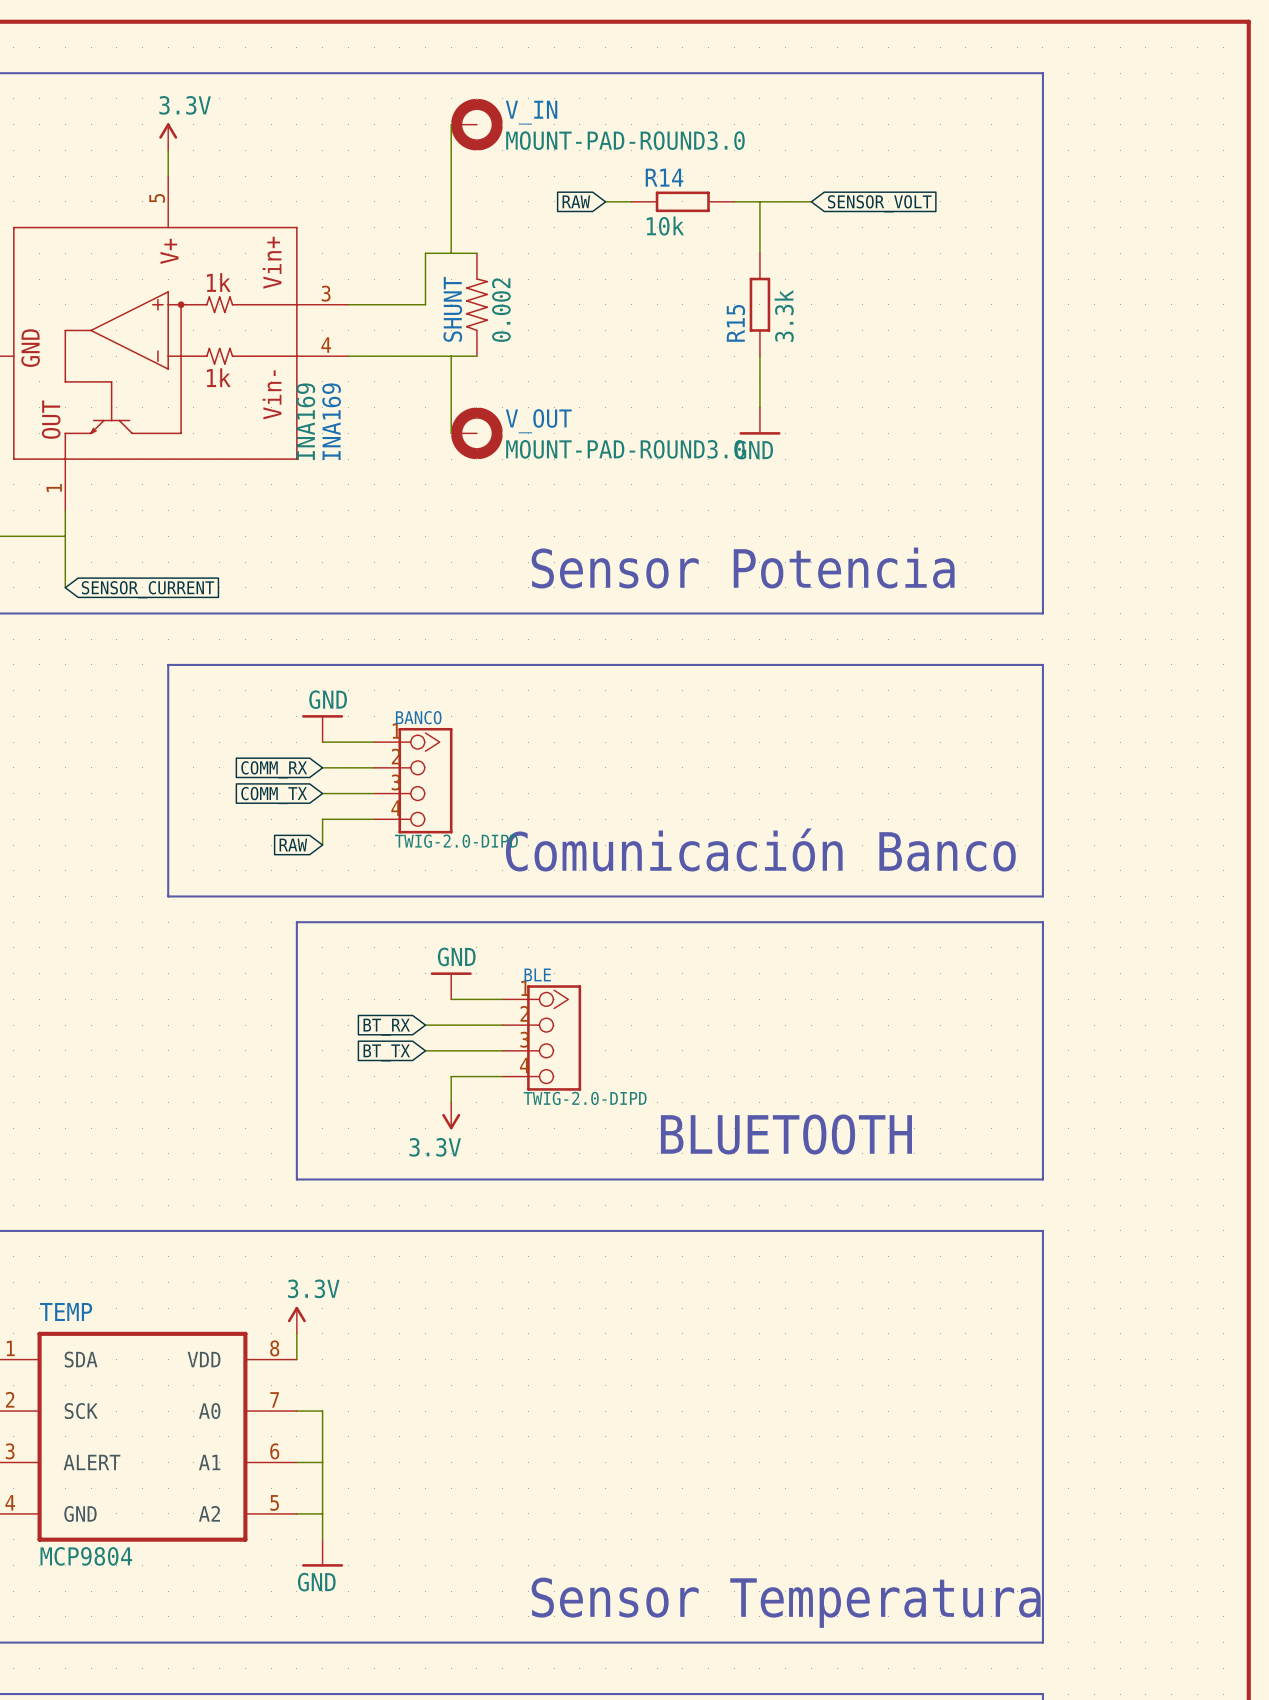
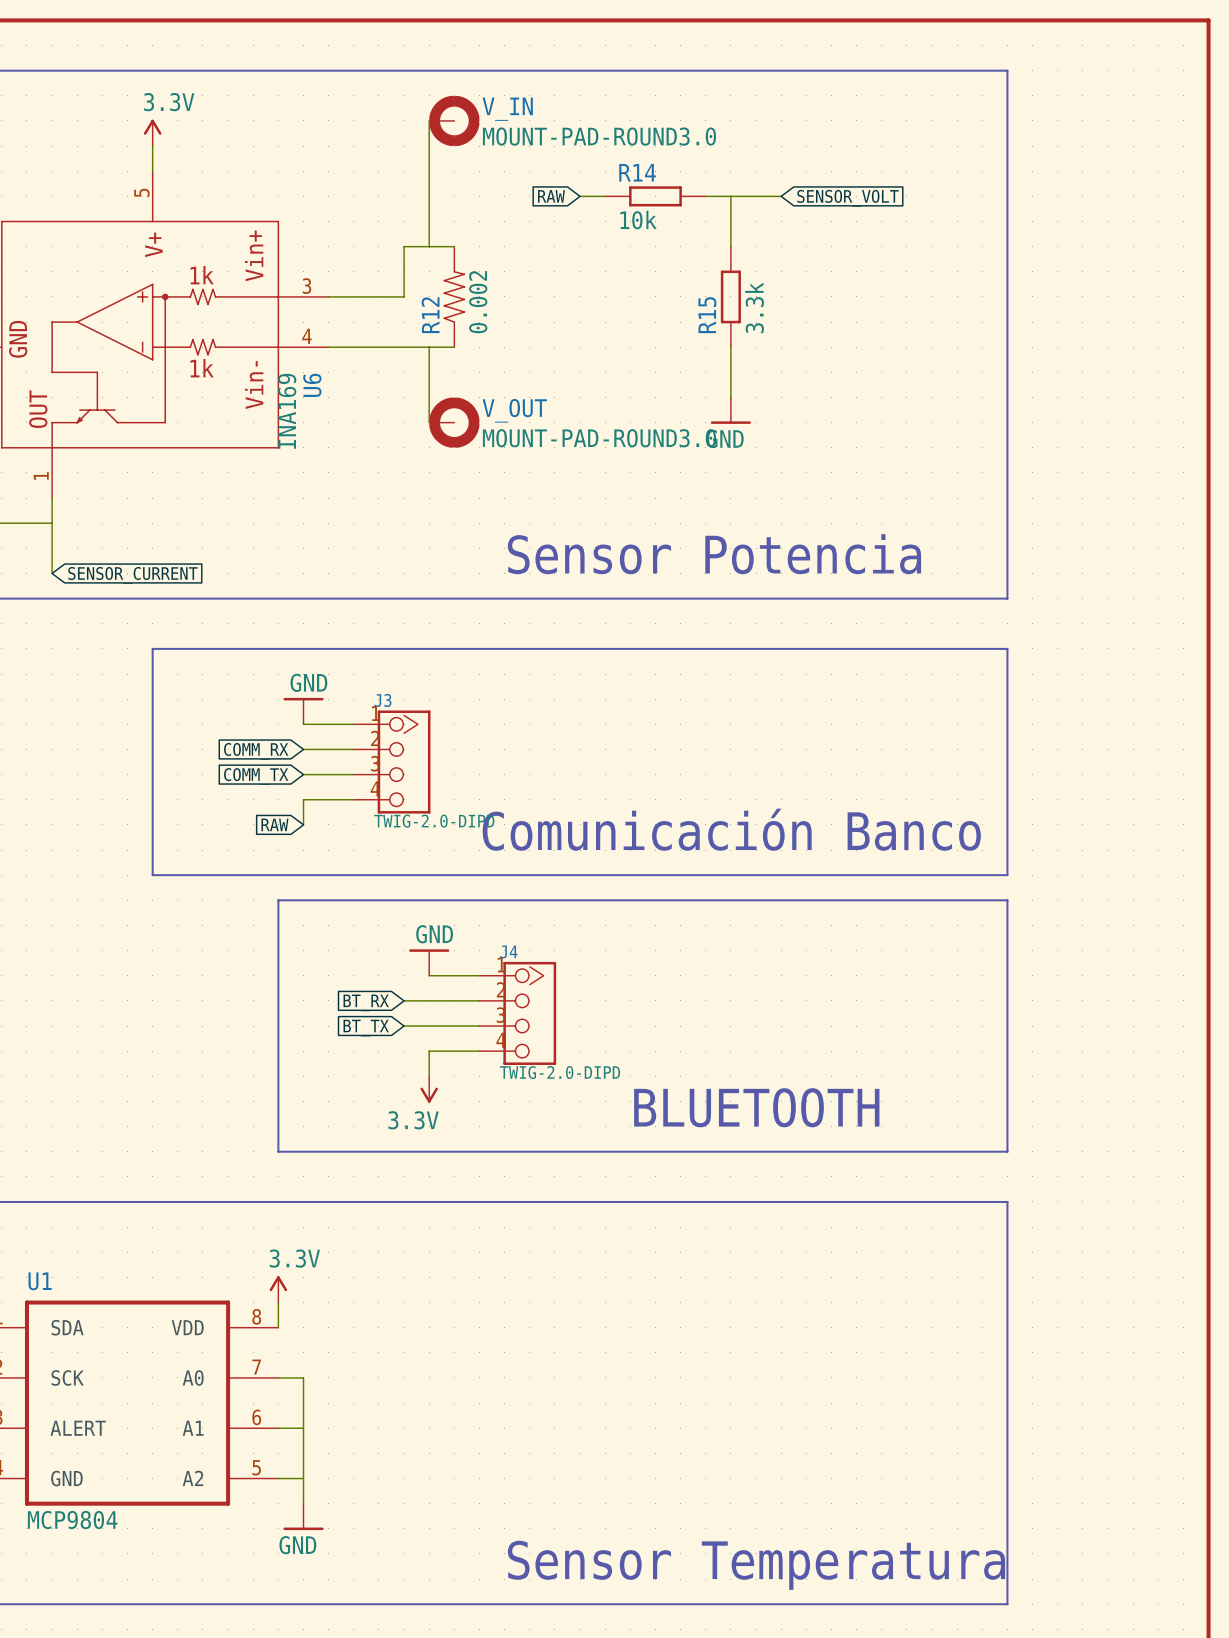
SHUNT name: SHUNT (452, 309) -> R12 (430, 315)
INA169 name: INA169 (331, 421) -> U6 (312, 385)
BANCO name: BANCO (418, 717) -> J3 (383, 700)
BLE name: BLE (537, 974) -> J4 (508, 951)
TEMP name: TEMP (66, 1311) -> U1 (40, 1281)

